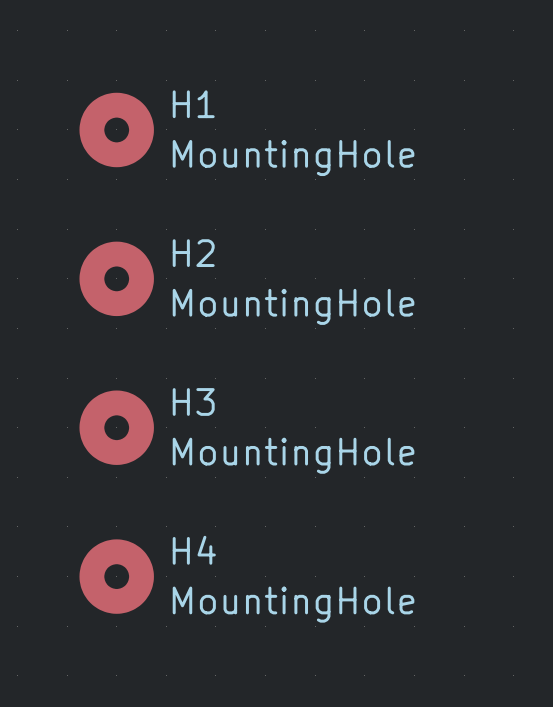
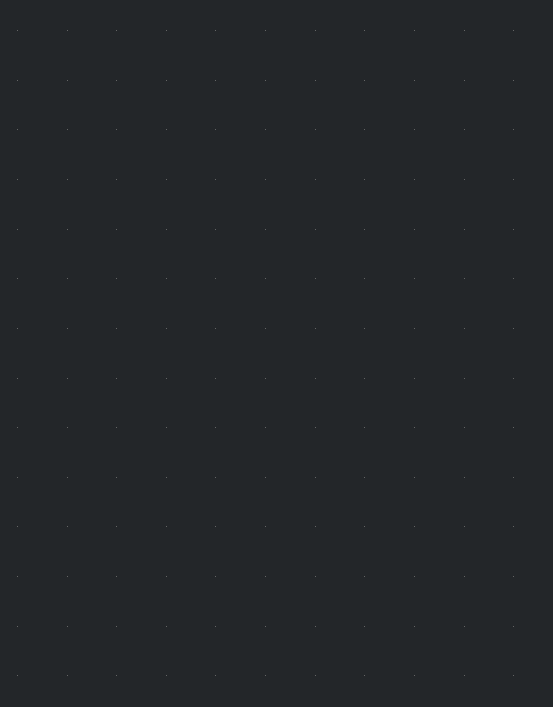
H1: MountingHole (116, 129) -> none
H2: MountingHole (116, 278) -> none
H3: MountingHole (116, 427) -> none
H4: MountingHole (116, 576) -> none

